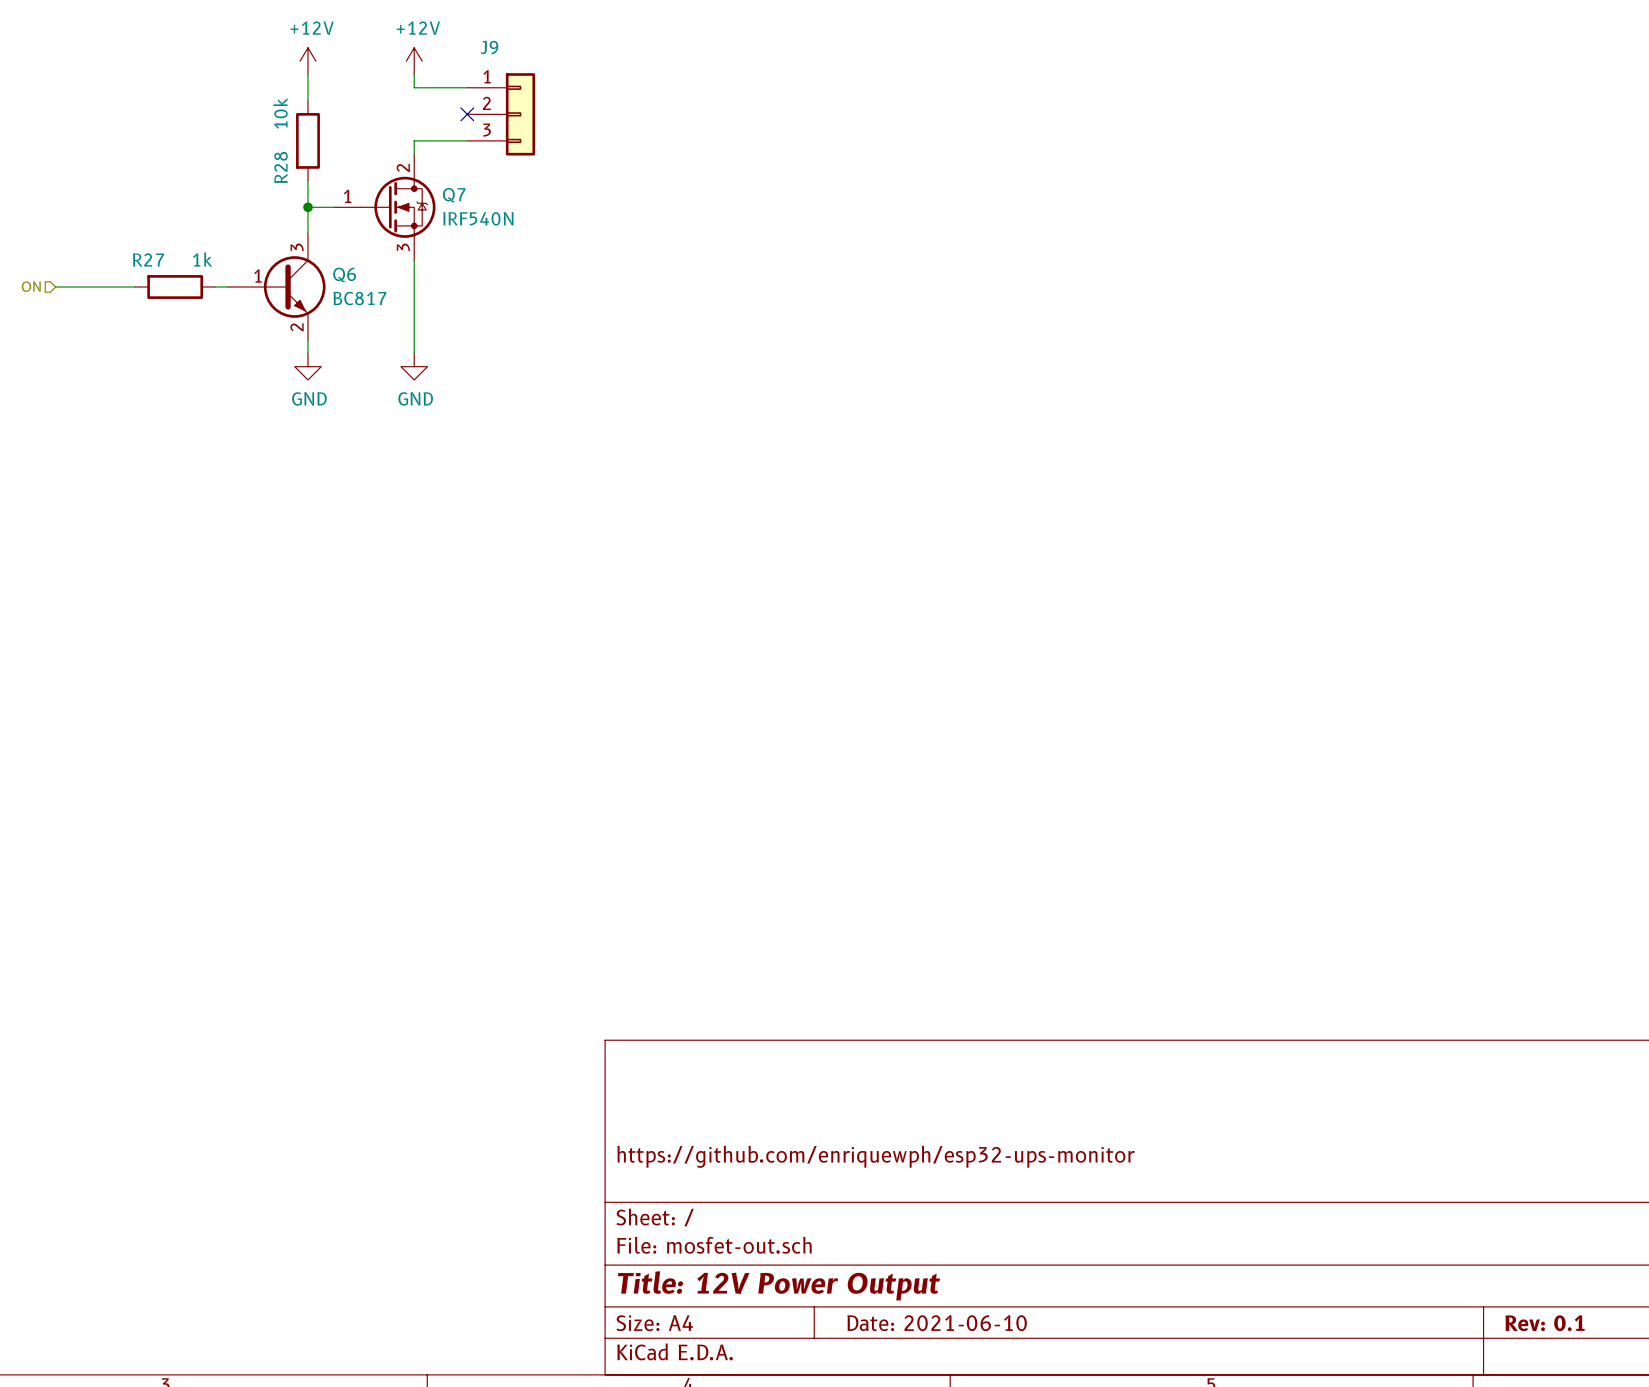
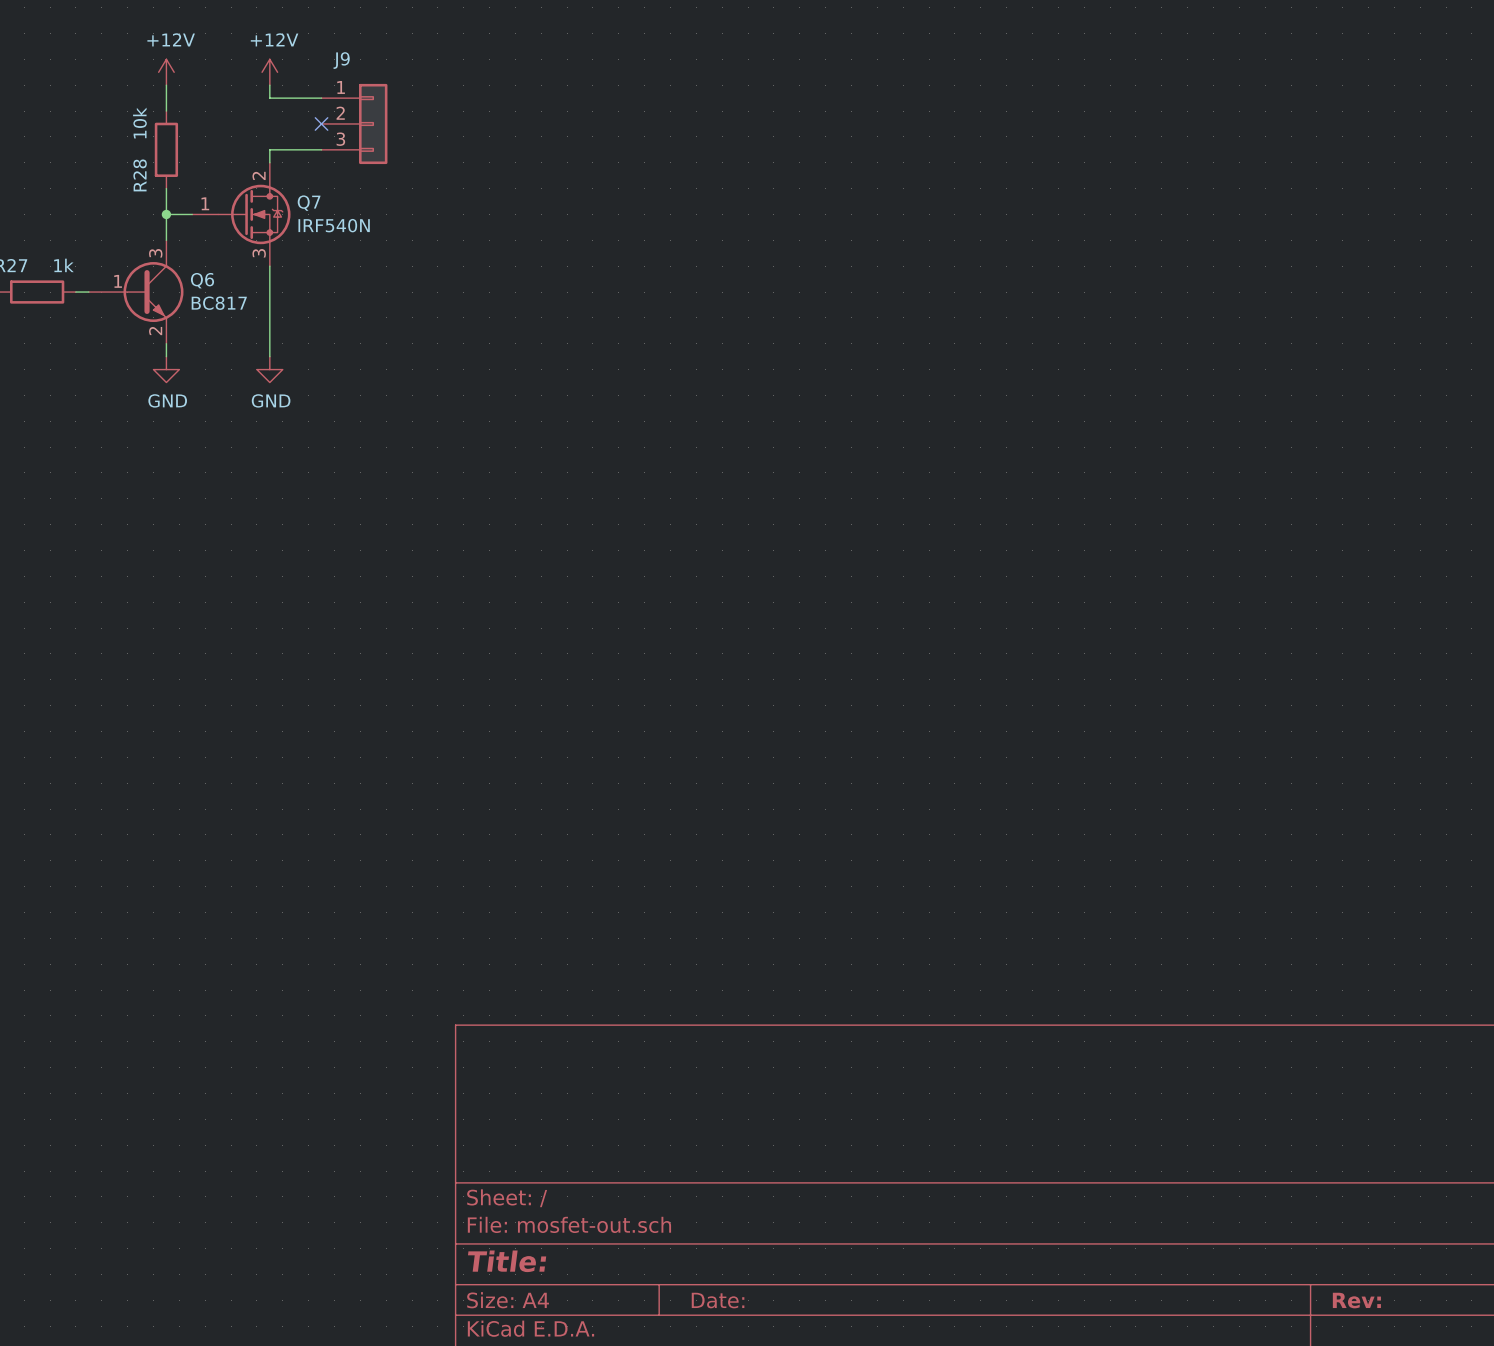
title block: https://github.com/enriquewph/esp32-ups-monitor (876, 1156) -> none
title block: Title: 12V Power Output (779, 1285) -> Title: (507, 1261)
title block: Date: 2021-06-10 (937, 1323) -> Date: (718, 1300)
title block: Rev: 0.1 (1544, 1323) -> Rev: (1356, 1300)

